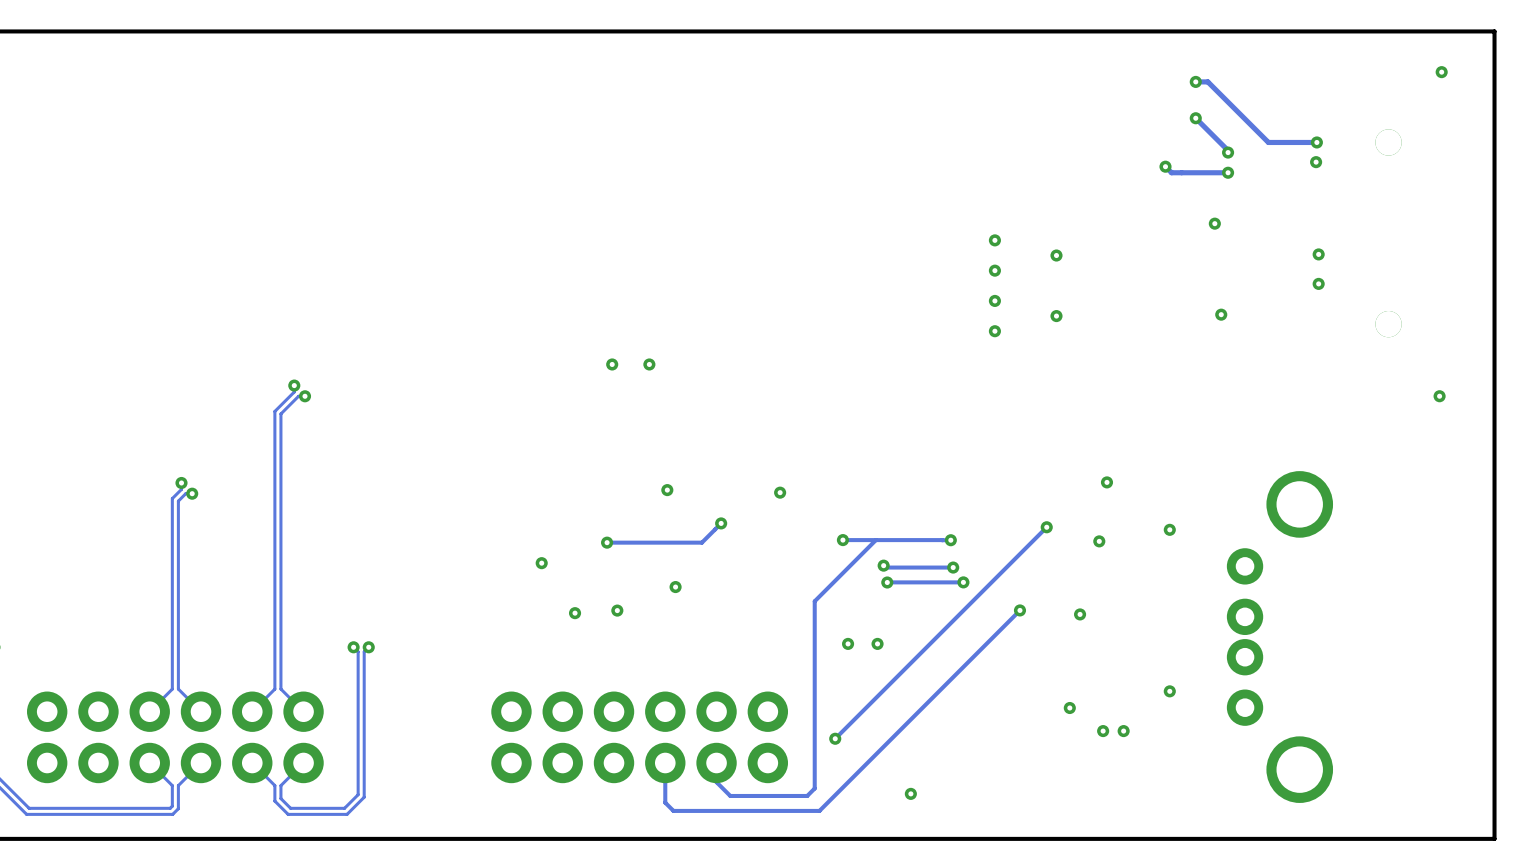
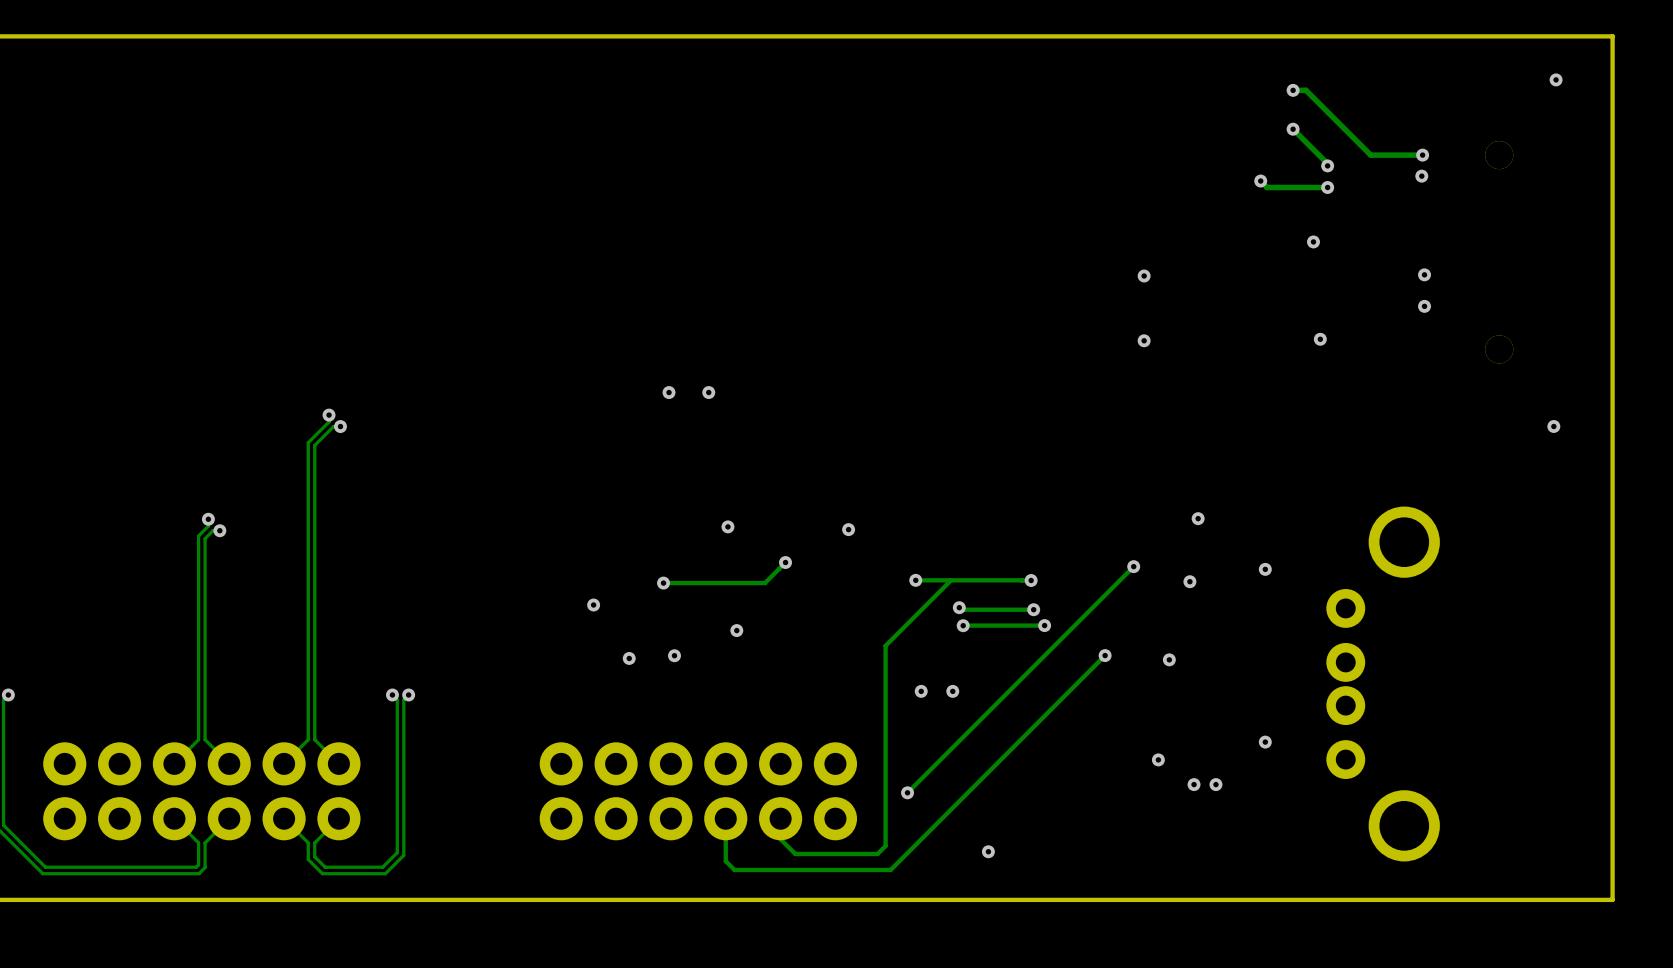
via: (994, 240) -> none
via: (994, 270) -> none
via: (994, 300) -> none
via: (994, 331) -> none

